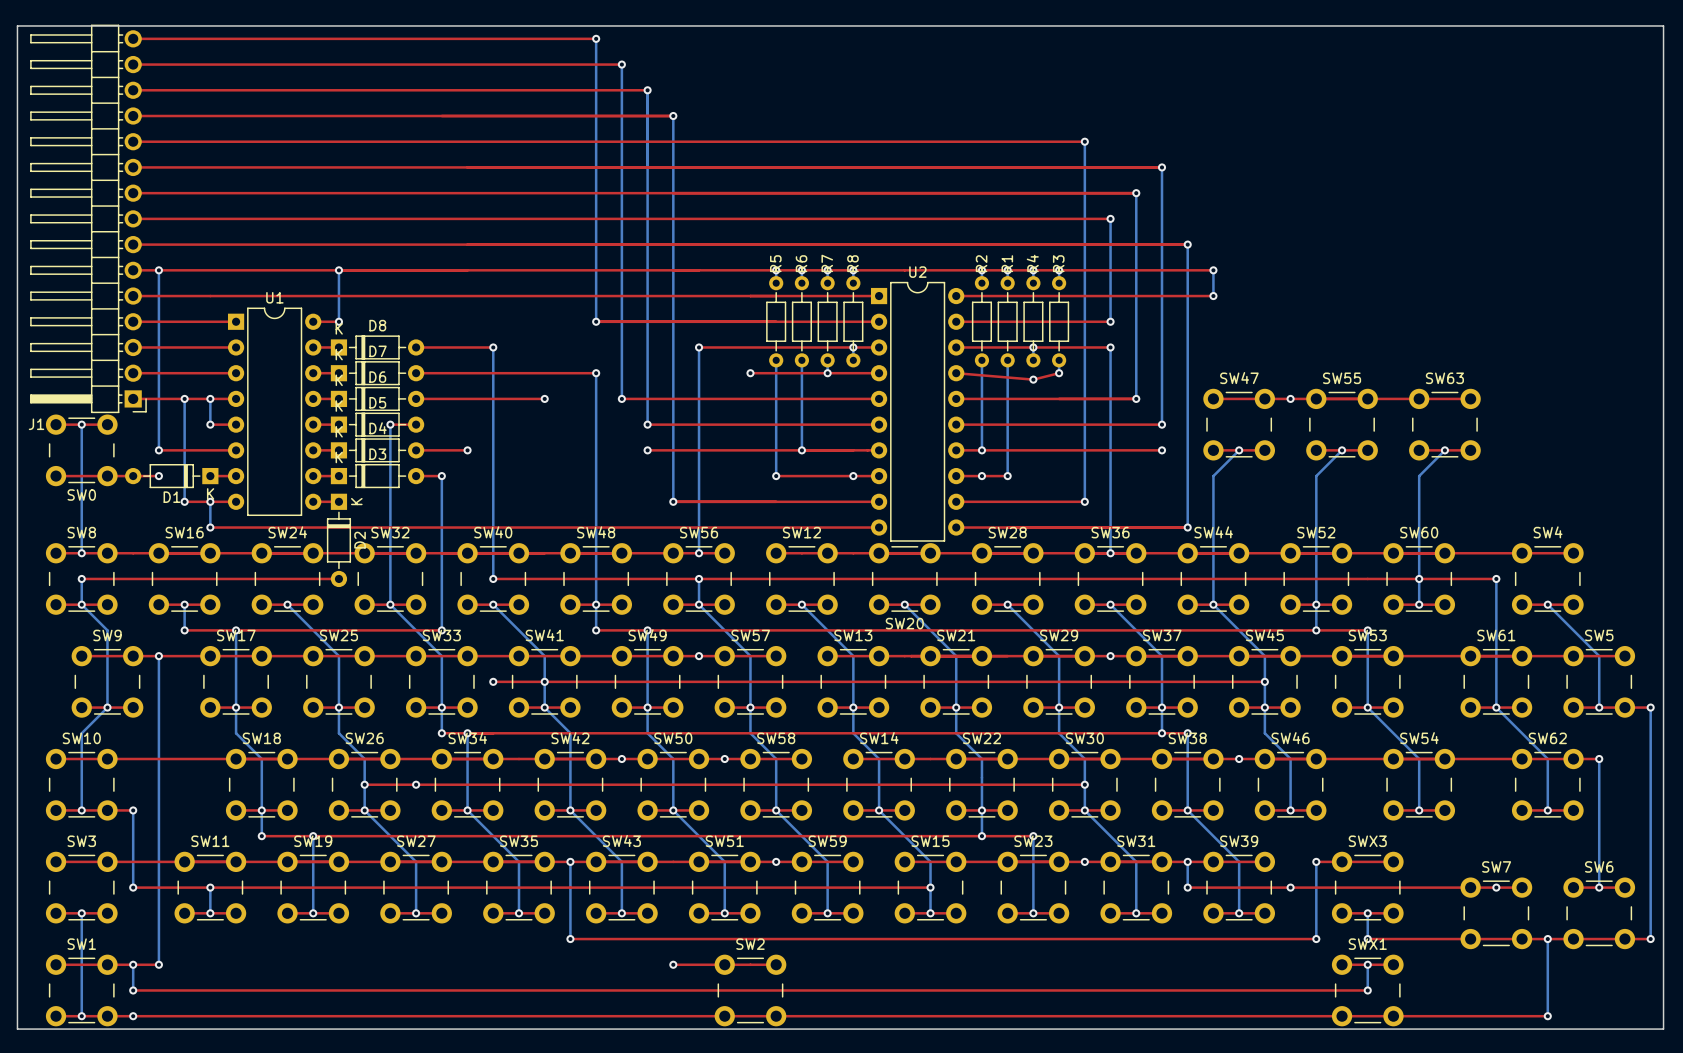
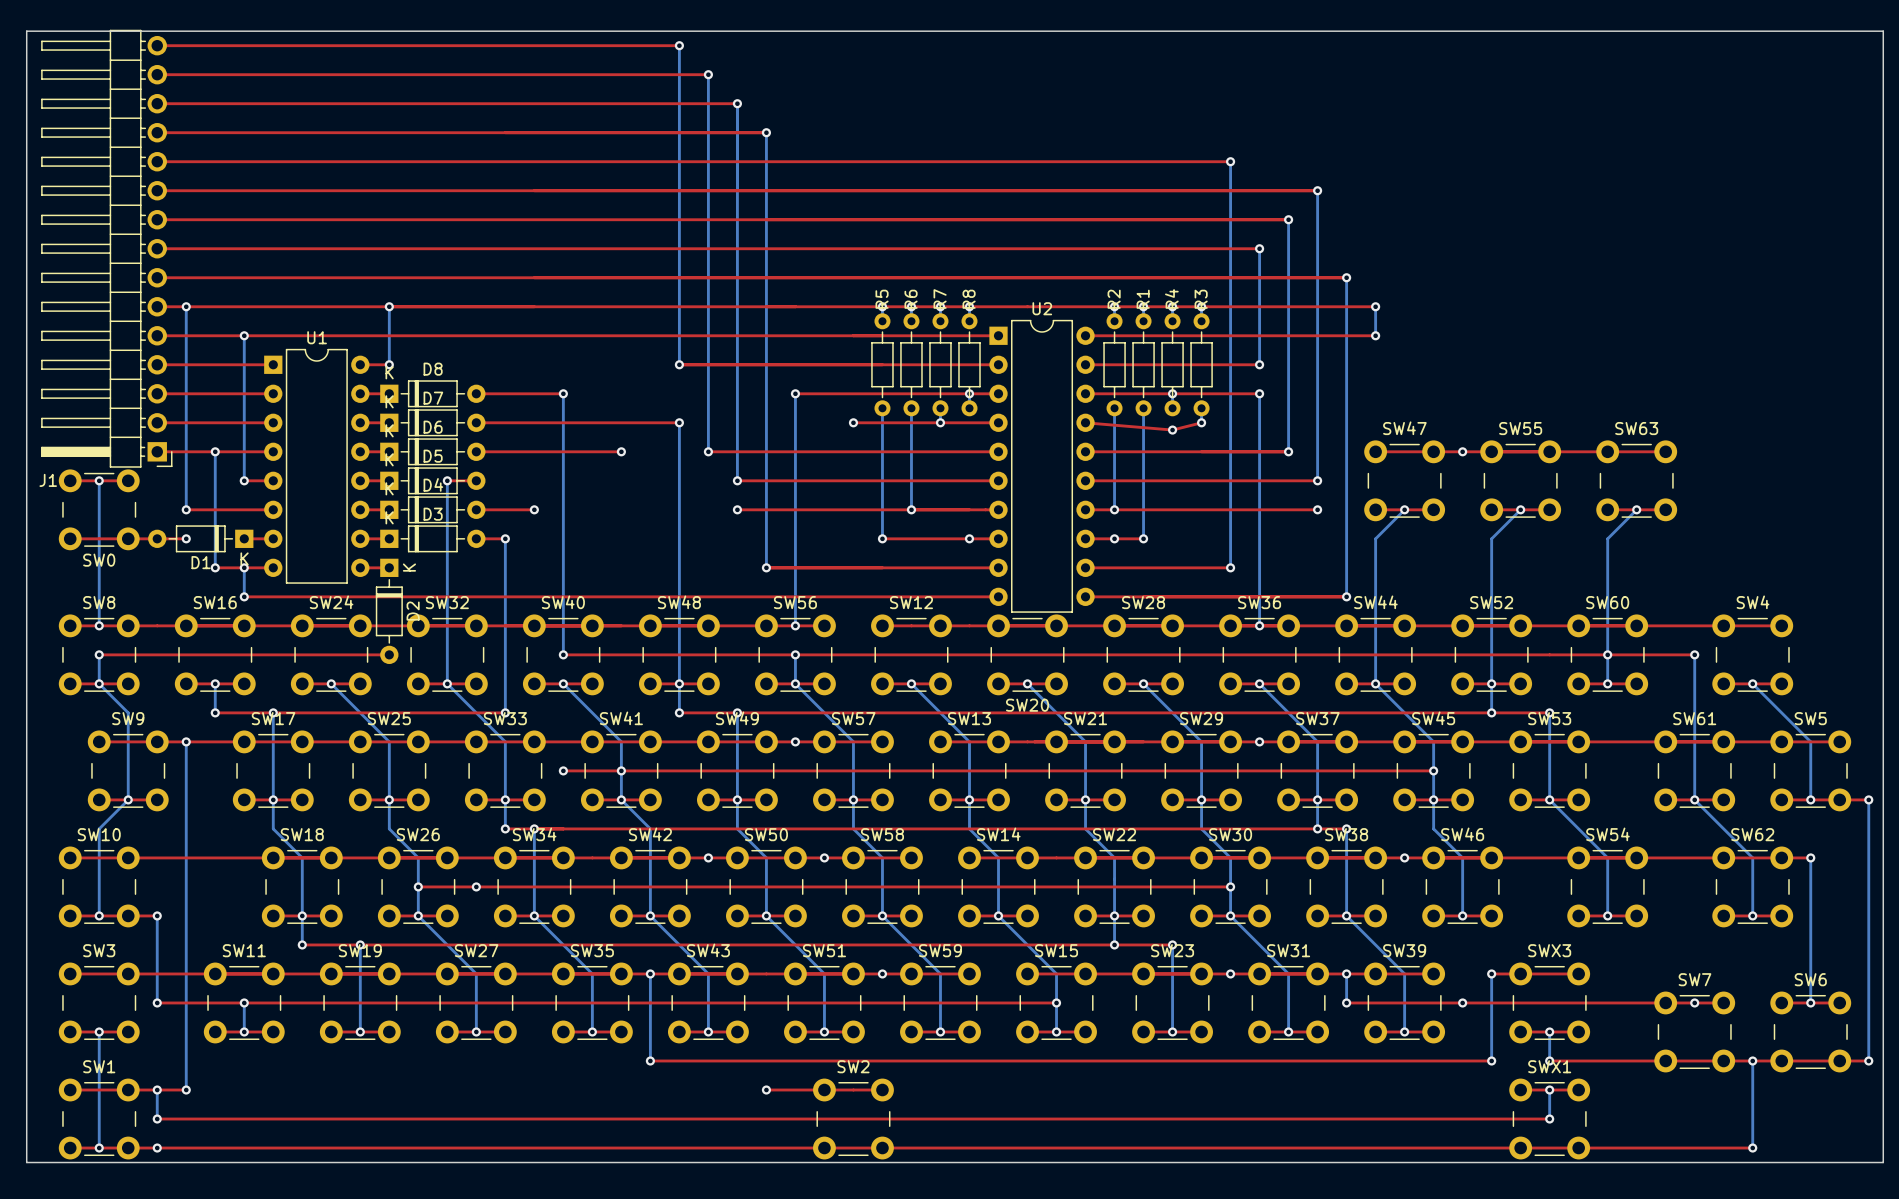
bottom track: none -> (244, 335) (244, 451)
via: none -> (244, 335)
via: (210, 398) -> none

